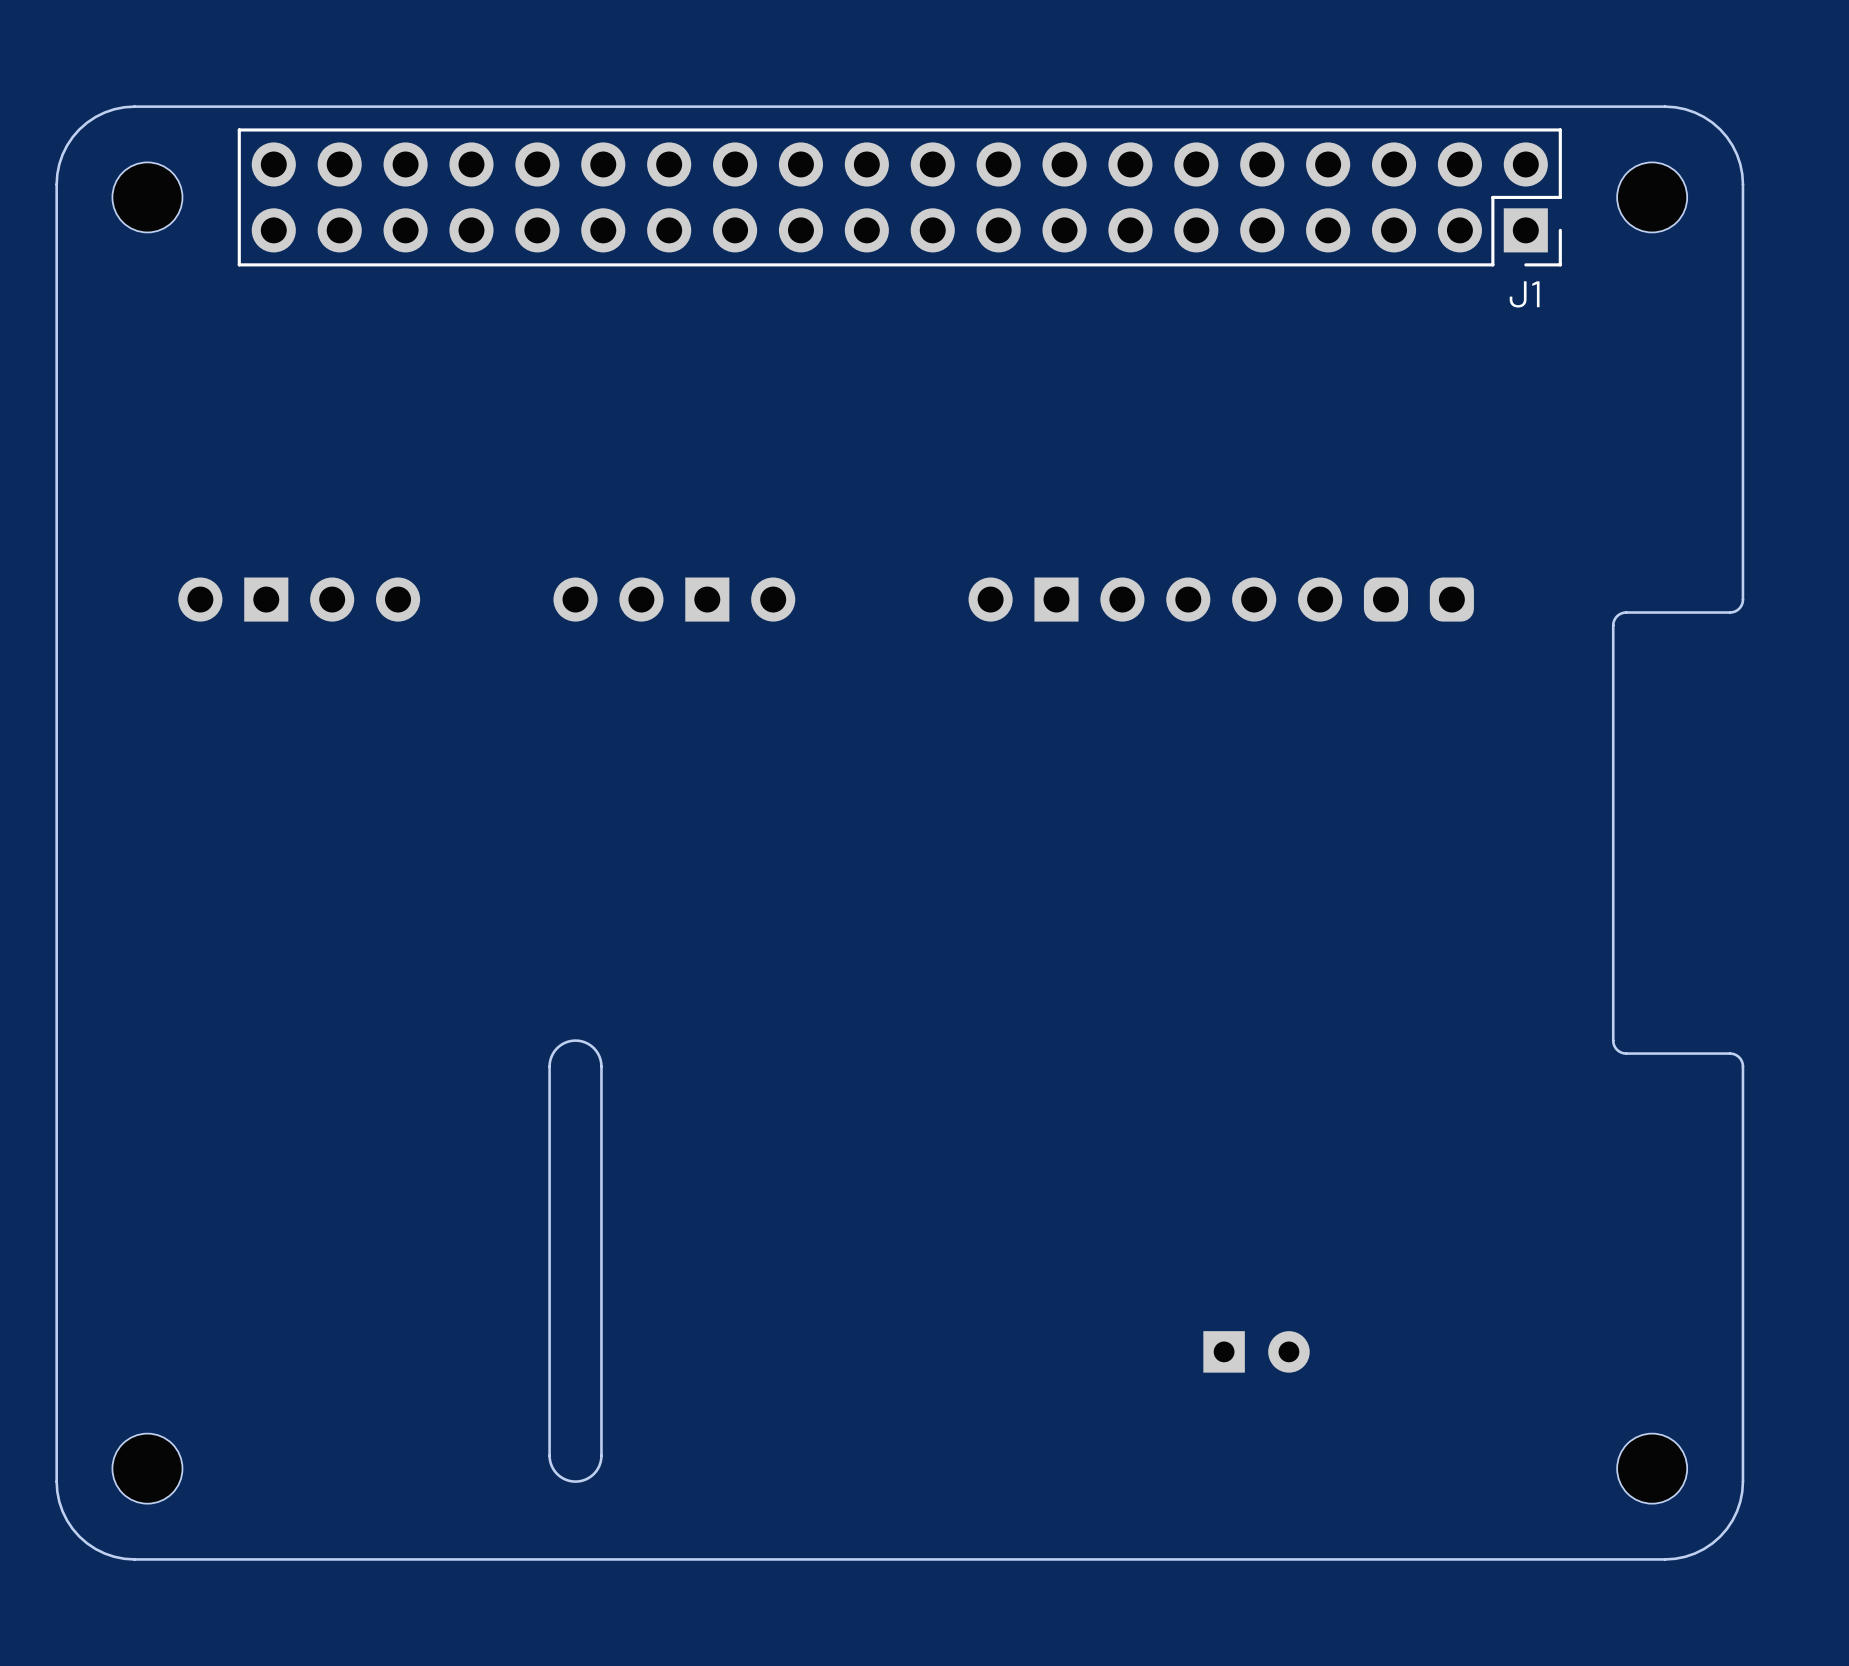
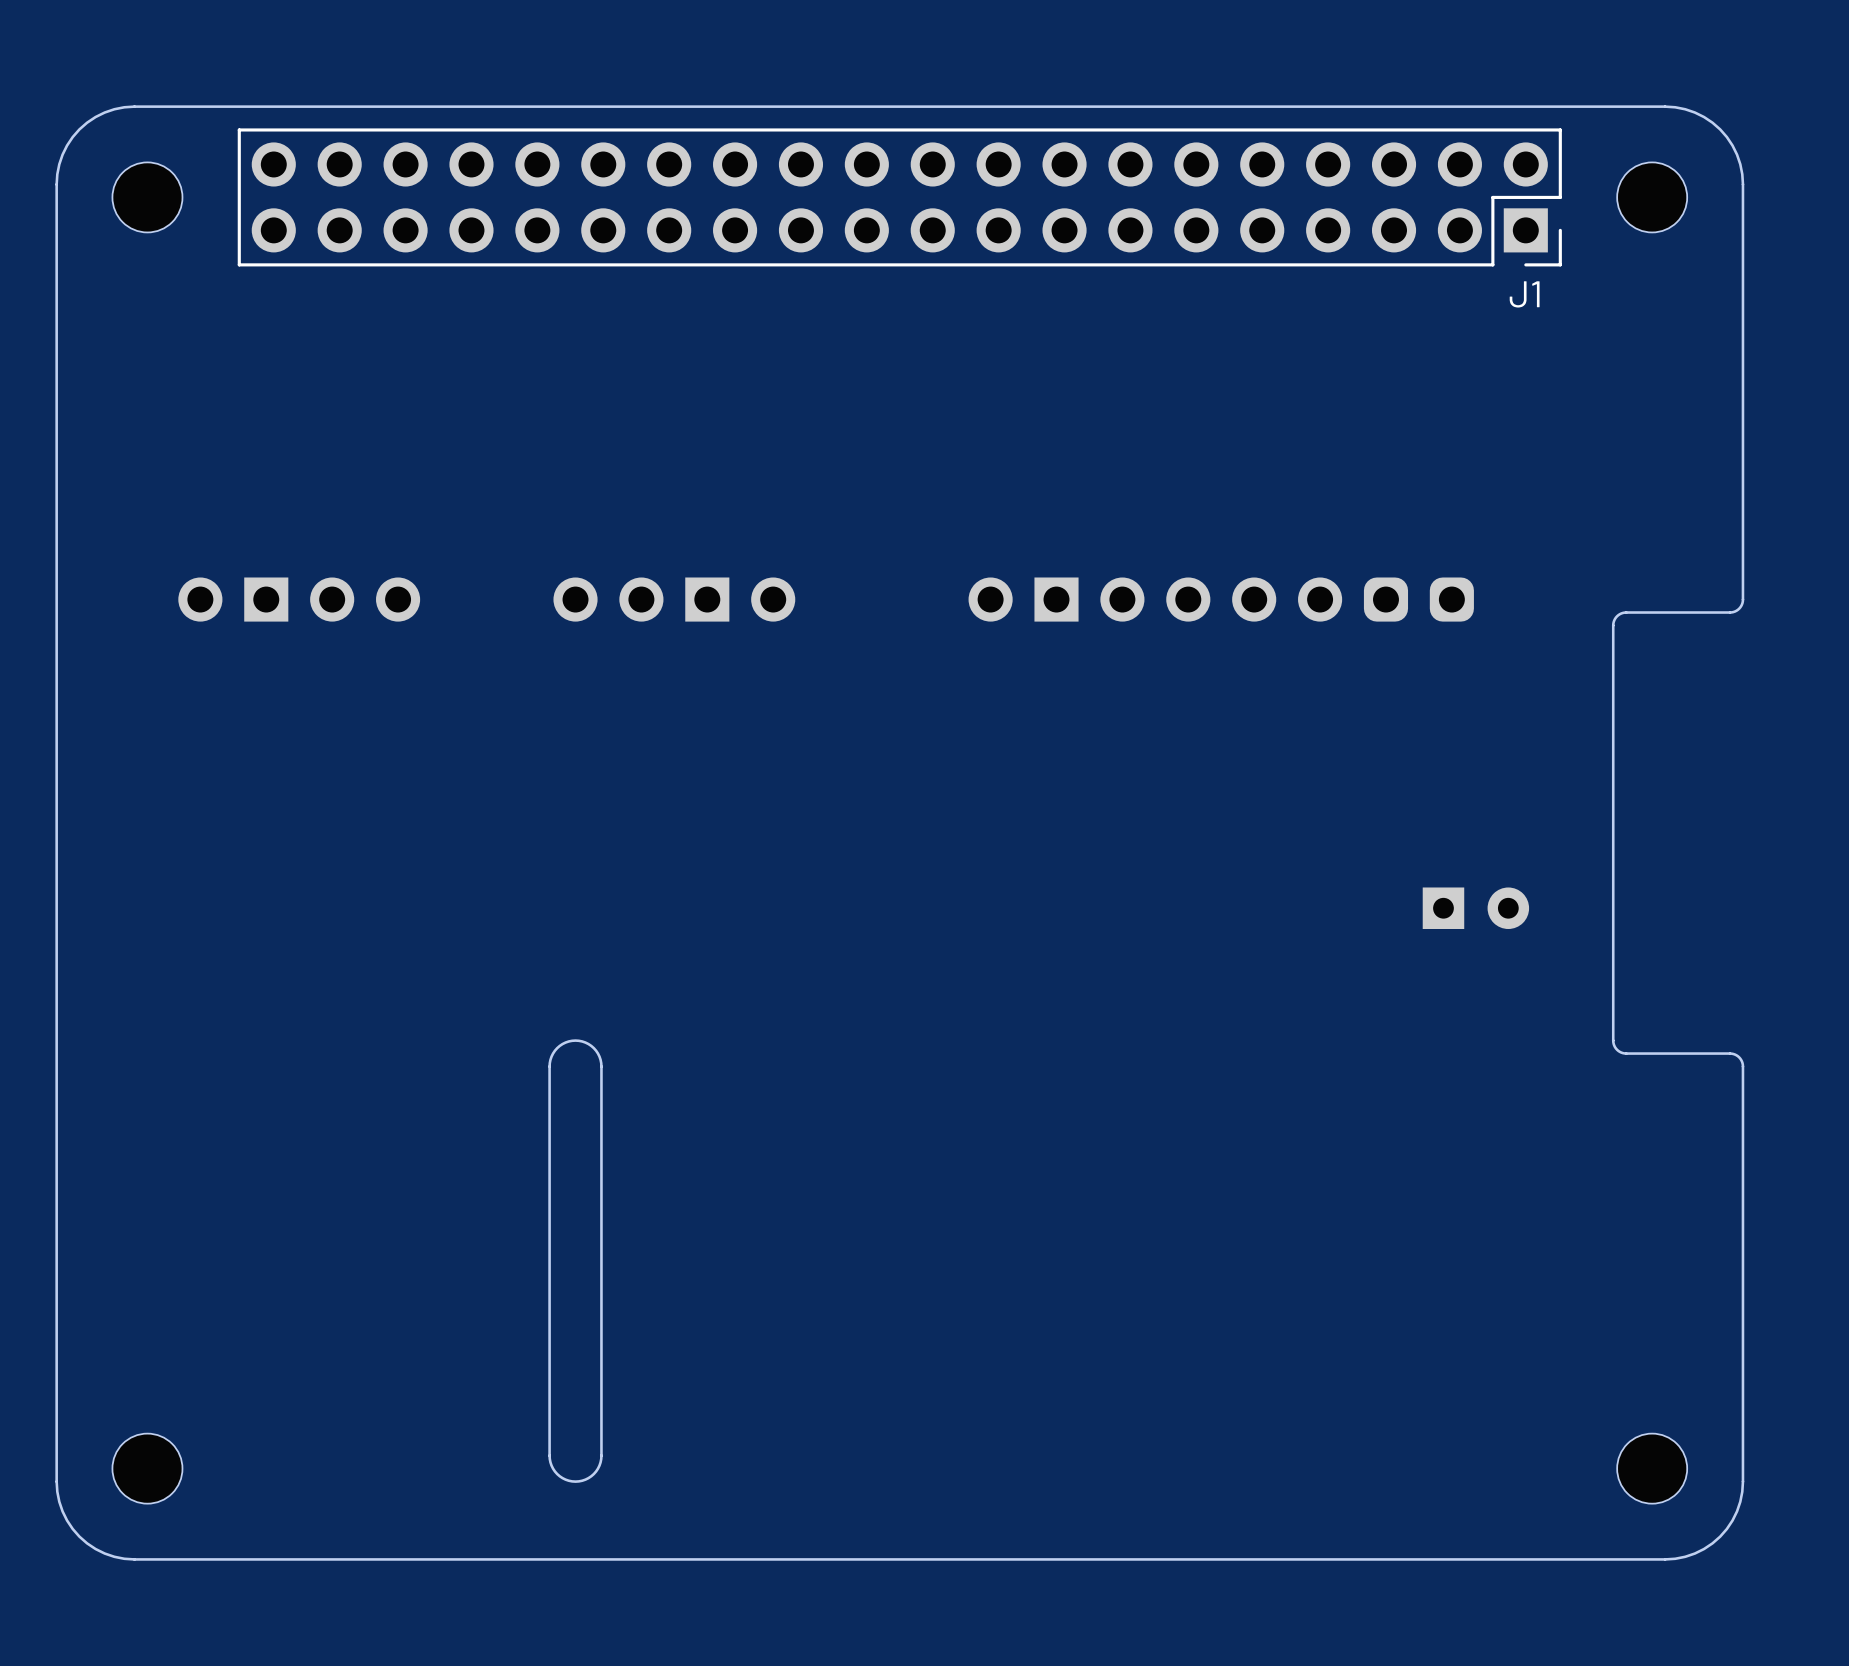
part position: (1256, 1351) -> (1475, 908)

